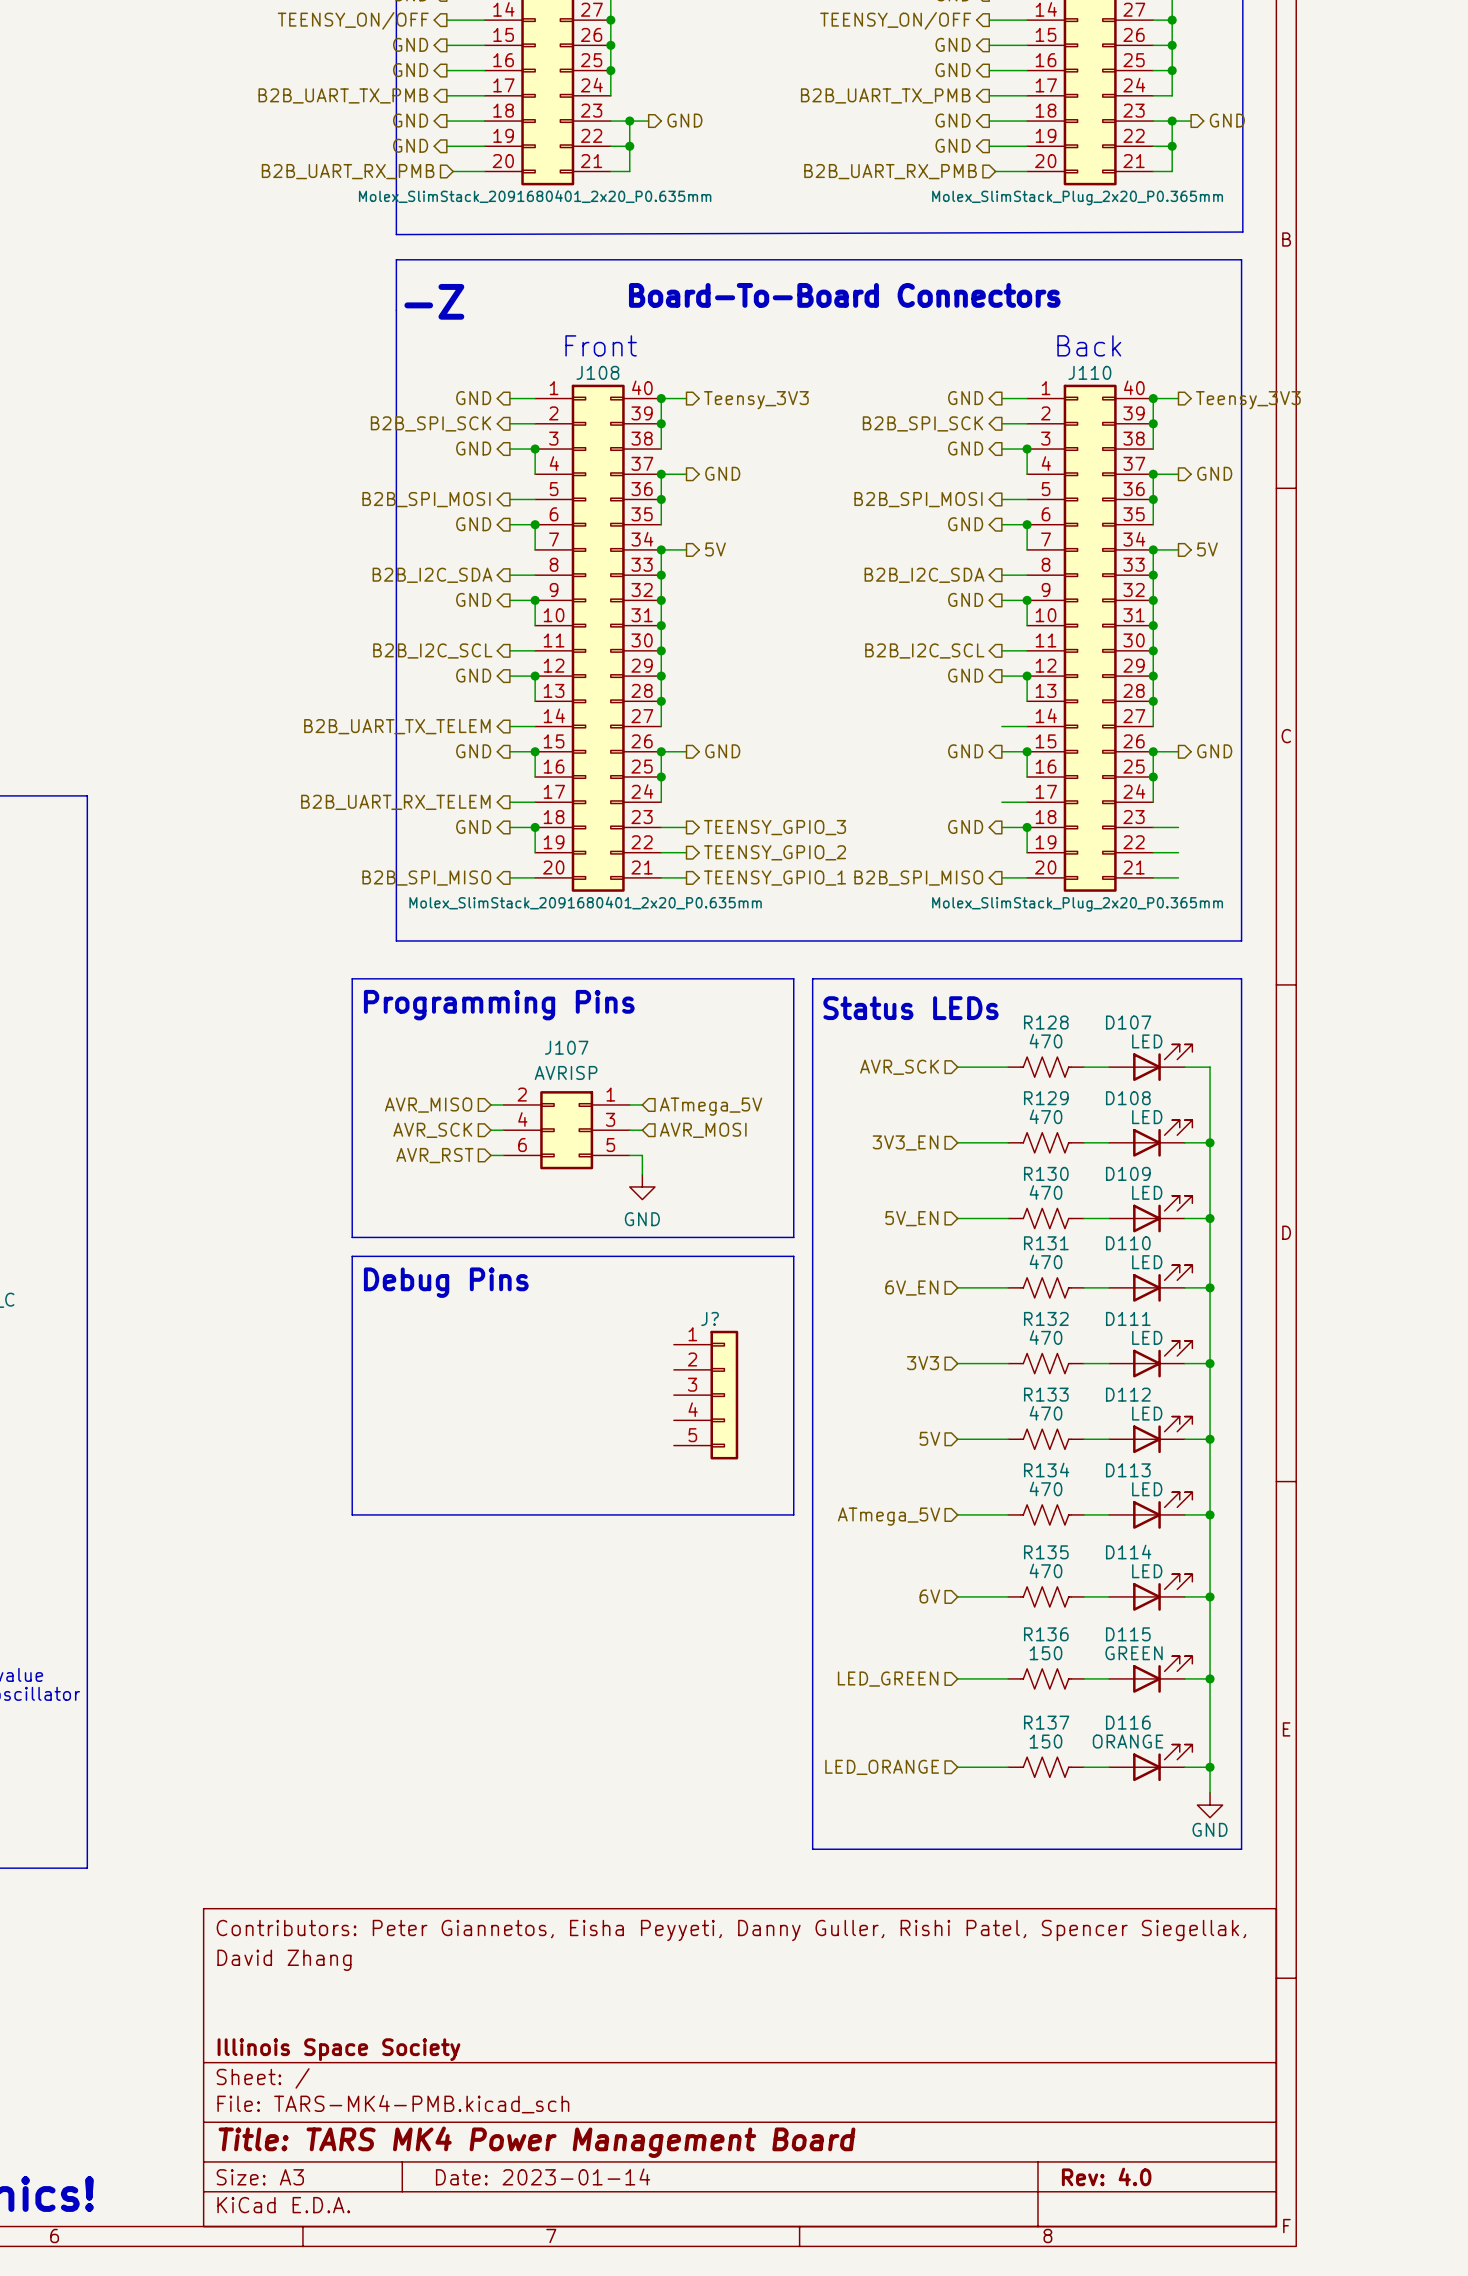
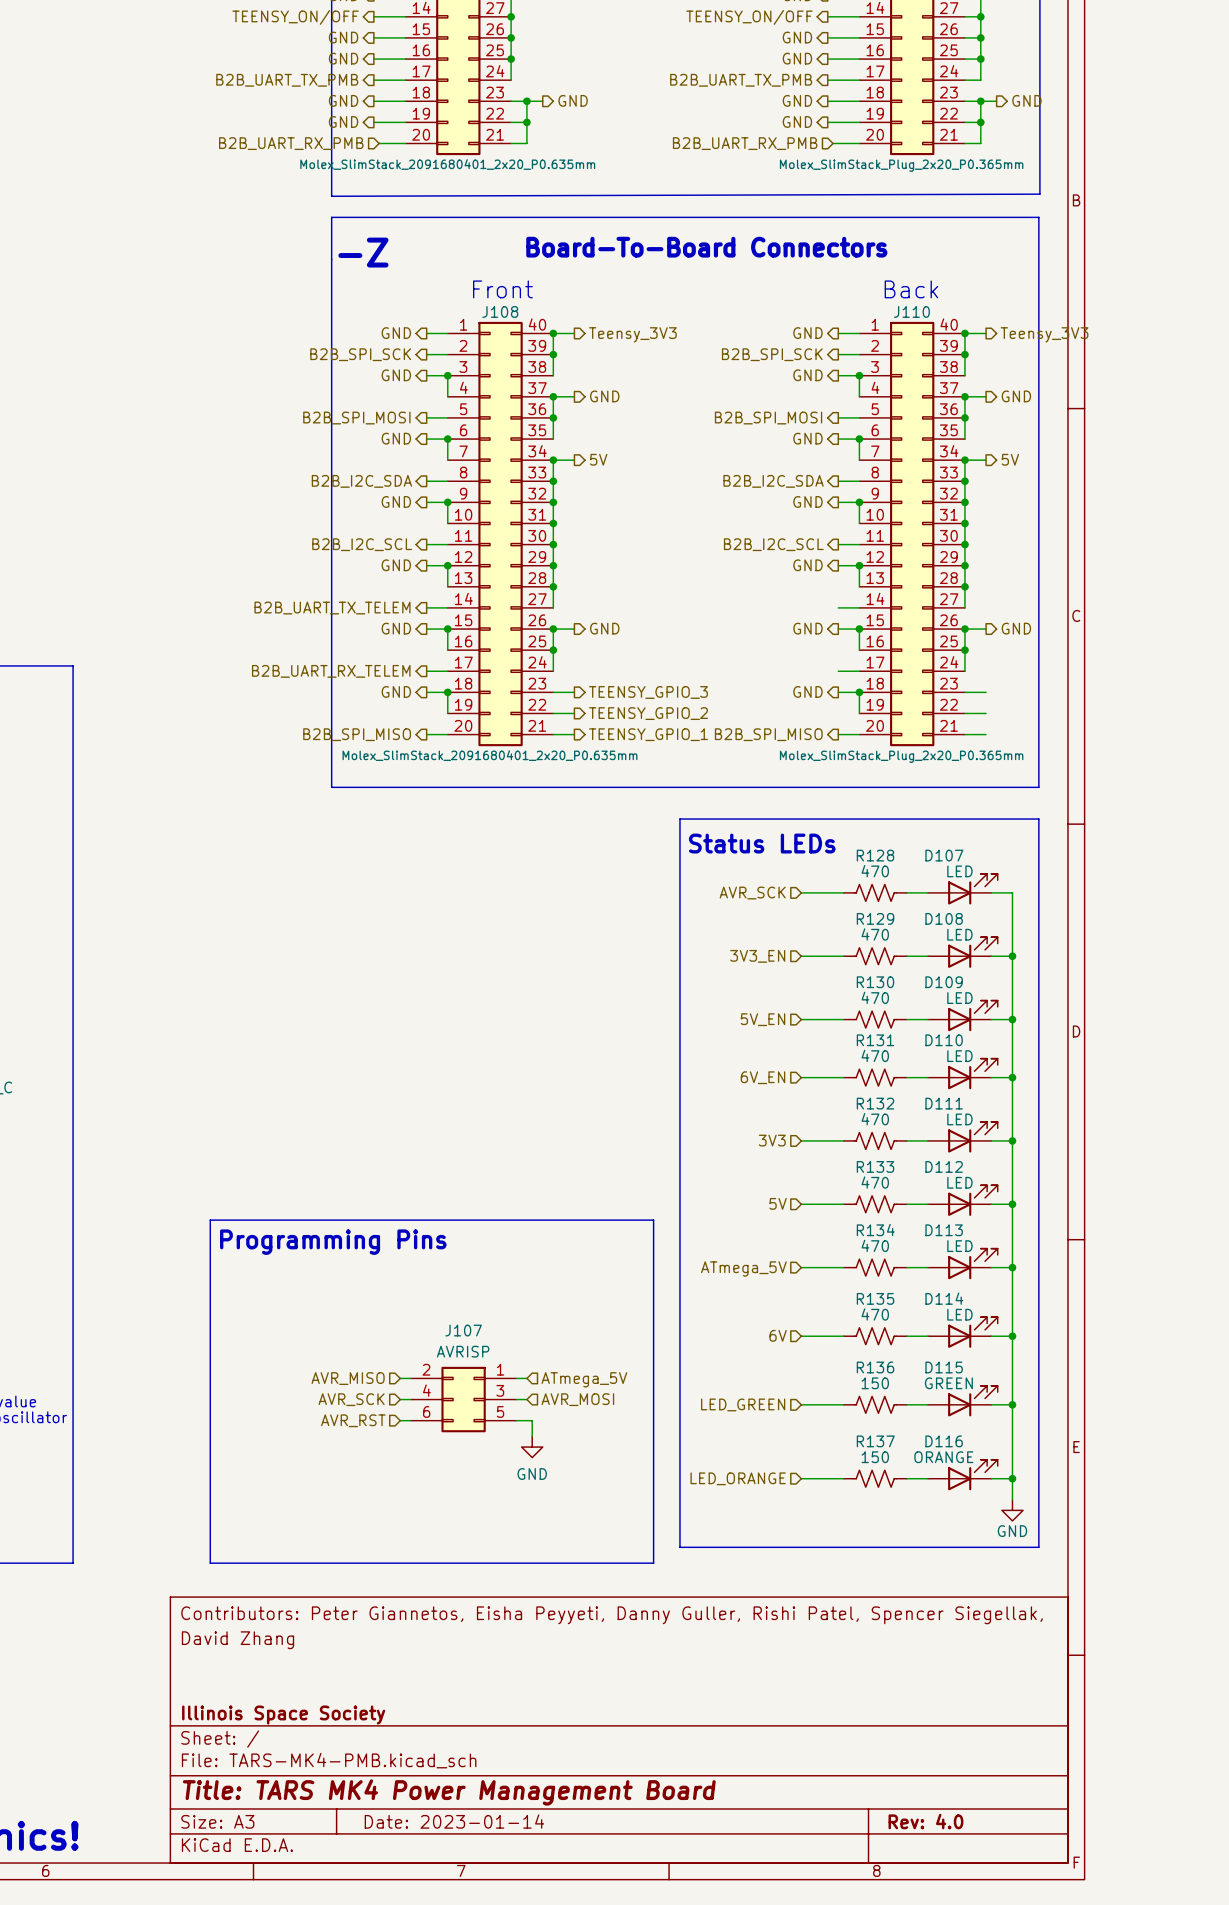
line: (352, 978) (793, 978) (793, 1237) (352, 1237) (352, 978) -> none
text: Programming Pins (499, 1005) -> none
wire: (490, 1104) (503, 1104) -> none
wire: (629, 1104) (642, 1104) -> none
hierarchical label: AVR_MISO (428, 1105) -> none
hierarchical label: ATmega_5V (711, 1106) -> none
hierarchical label: AVR_SCK (432, 1130) -> none
wire: (490, 1130) (503, 1130) -> none
J107 position: (566, 1130) -> (463, 1399)
wire: (629, 1130) (642, 1130) -> none
hierarchical label: AVR_MOSI (703, 1130) -> none
hierarchical label: AVR_RST (434, 1155) -> none
wire: (490, 1155) (503, 1155) -> none
wire: (629, 1155) (642, 1155) (642, 1174) -> none
power symbol: GND (642, 1186) -> none
line: (352, 1256) (793, 1256) (793, 1514) (352, 1514) (352, 1256) -> none
text: Debug Pins (446, 1282) -> none
J?: (706, 1395) -> none
line: none -> (210, 1220) (653, 1220) (653, 1563) (210, 1563) (210, 1220)
text: none -> Programming Pins (333, 1242)
hierarchical label: none -> AVR_MISO (348, 1378)
wire: none -> (400, 1378) (410, 1378)
wire: none -> (516, 1378) (526, 1378)
hierarchical label: none -> ATmega_5V (584, 1379)
hierarchical label: none -> AVR_SCK (351, 1399)
wire: none -> (400, 1399) (410, 1399)
wire: none -> (516, 1399) (526, 1399)
hierarchical label: none -> AVR_MOSI (577, 1399)
hierarchical label: none -> AVR_RST (353, 1420)
wire: none -> (400, 1420) (410, 1420)
wire: none -> (516, 1420) (532, 1420) (532, 1436)
power symbol: none -> GND (532, 1447)

